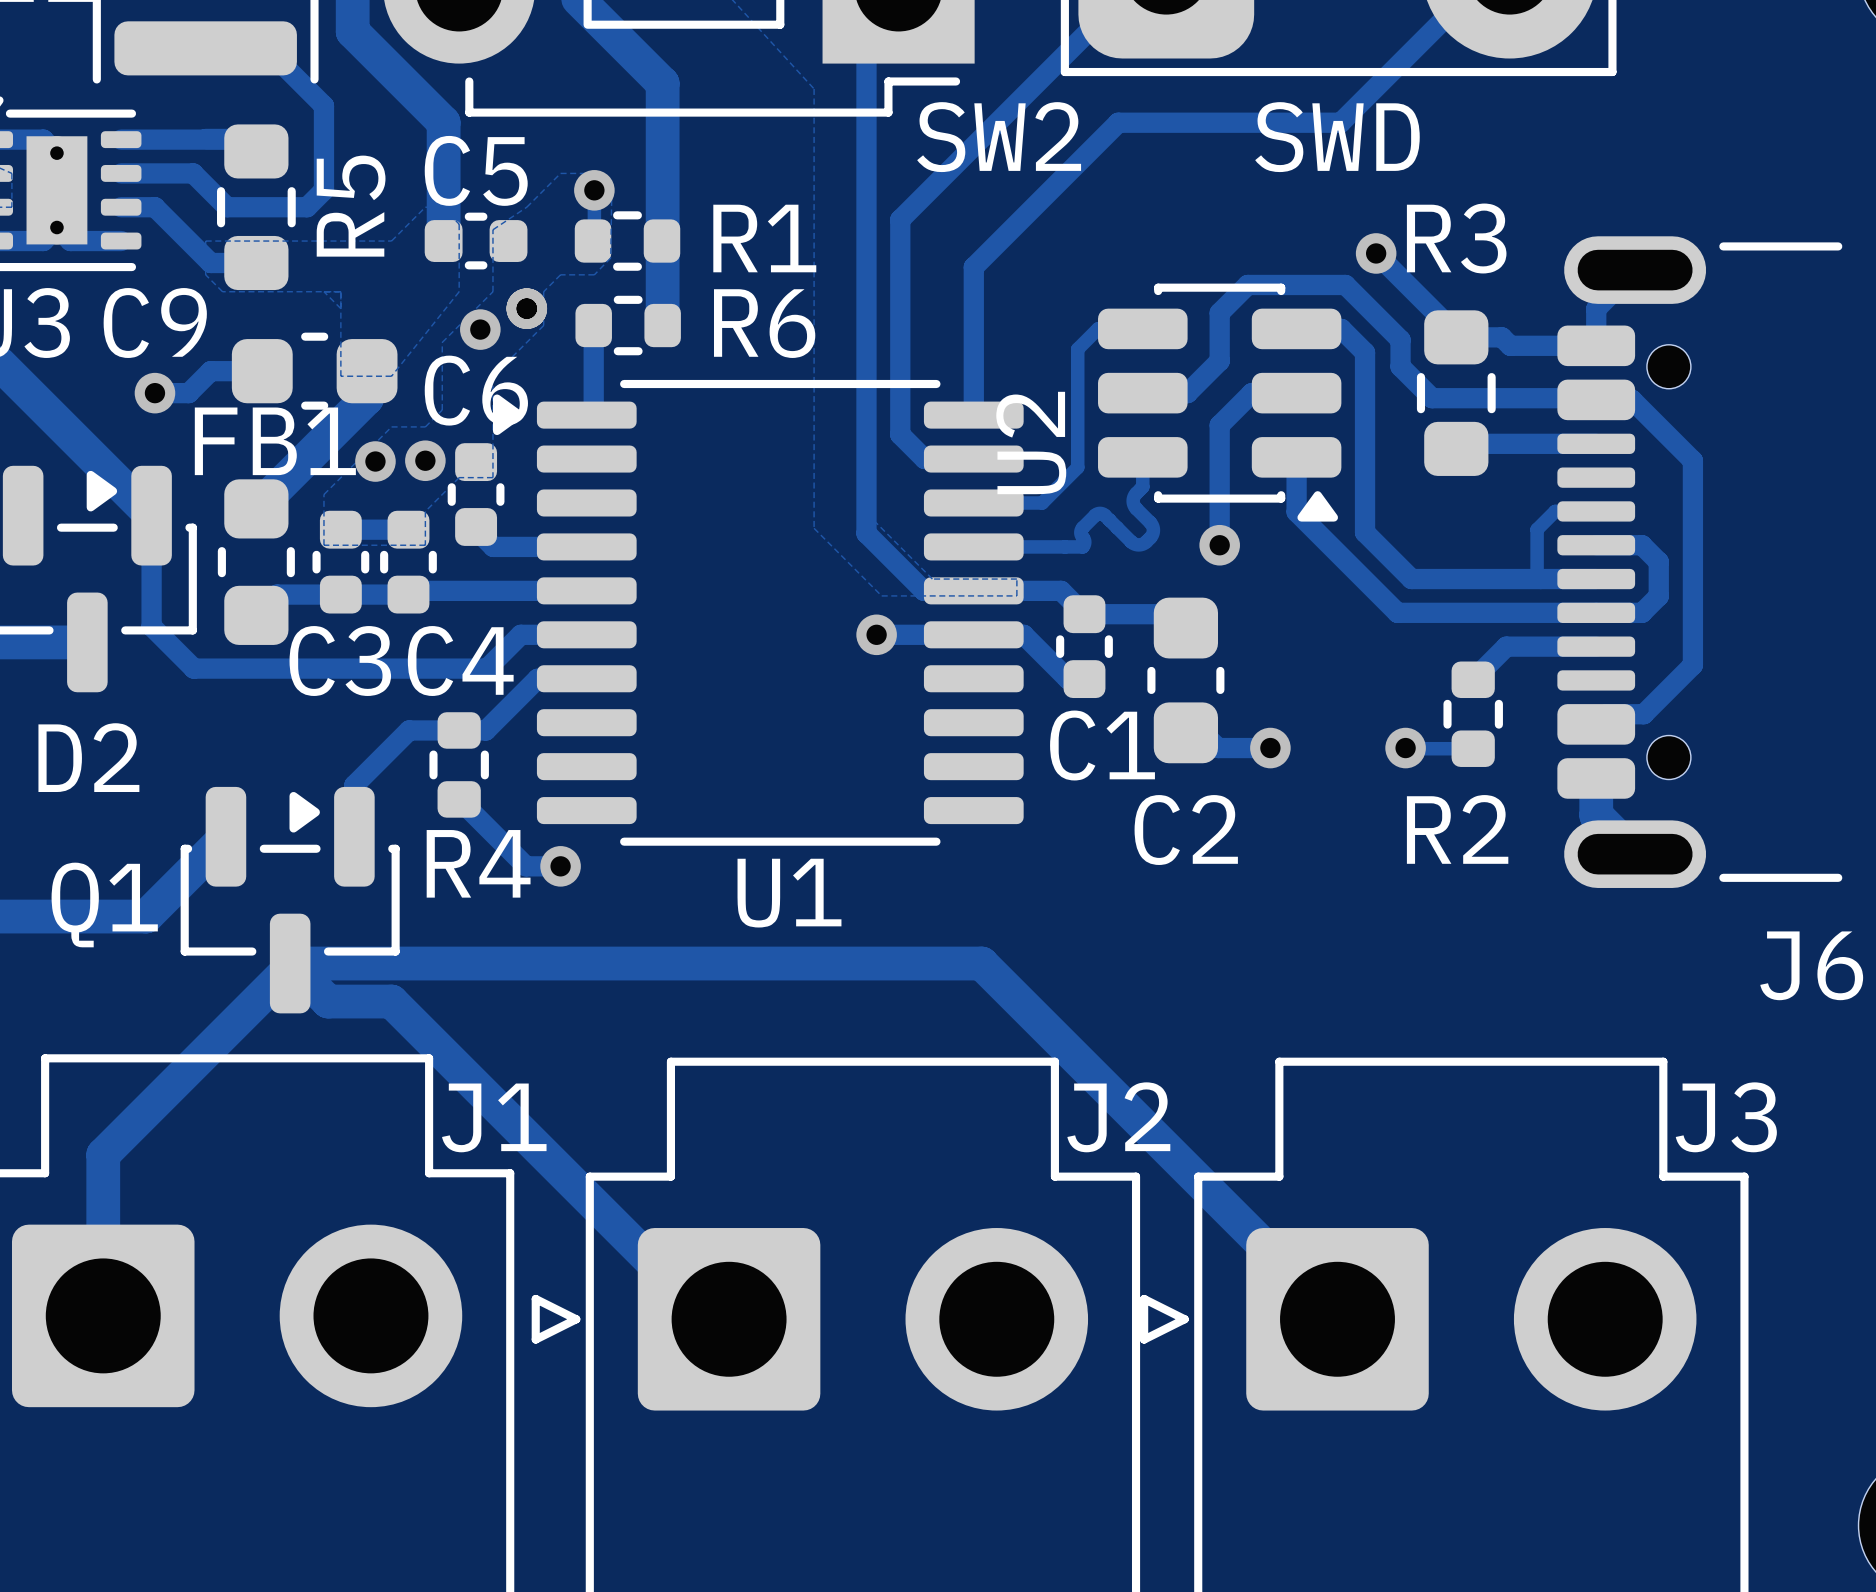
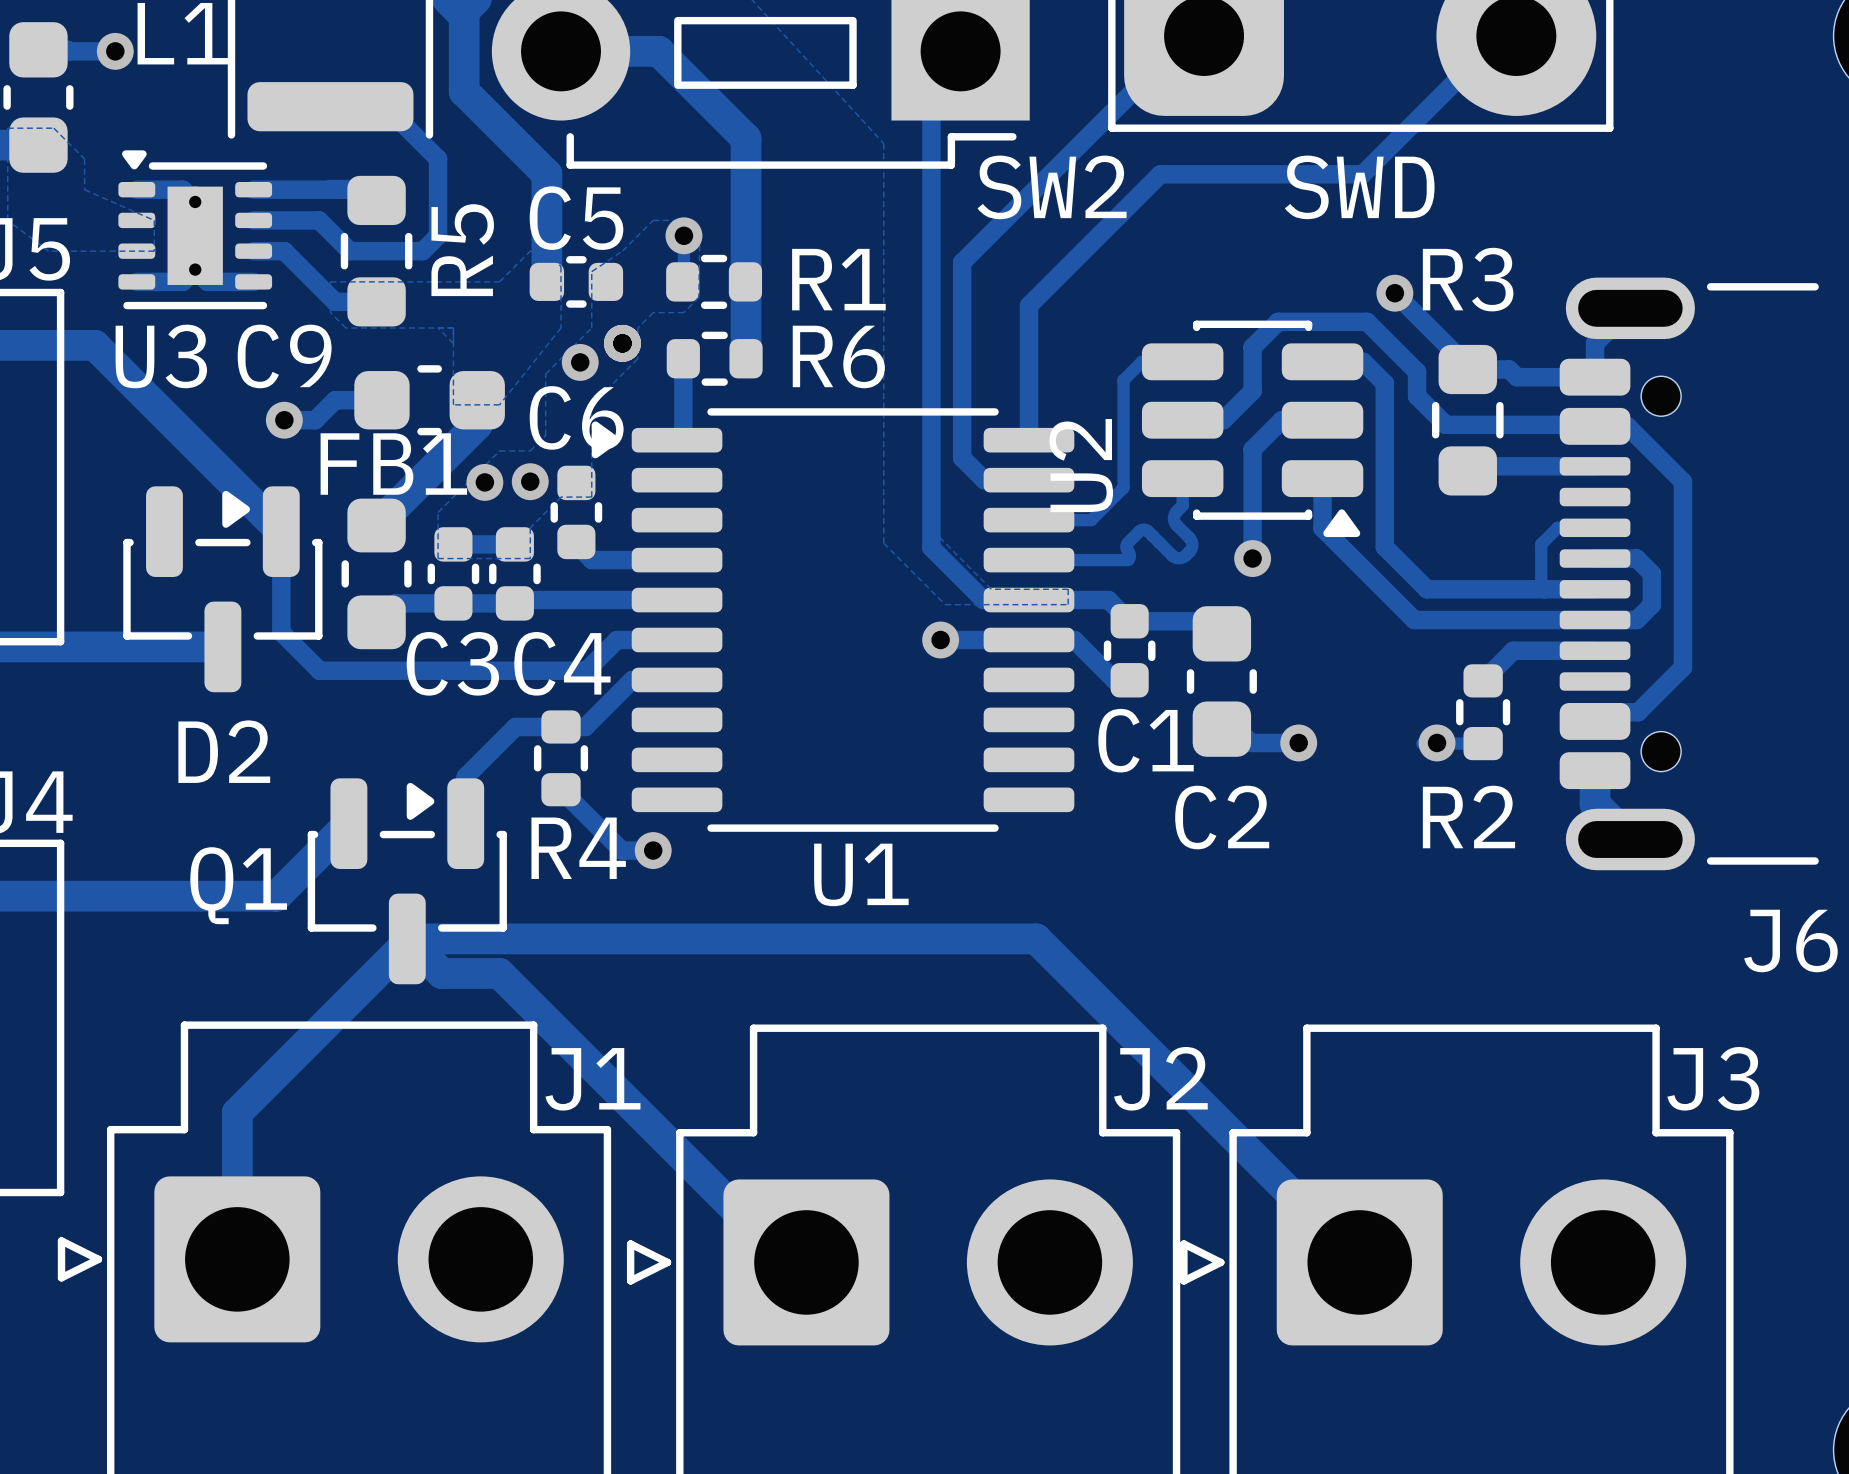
via position: (1405, 748) -> (1437, 742)

